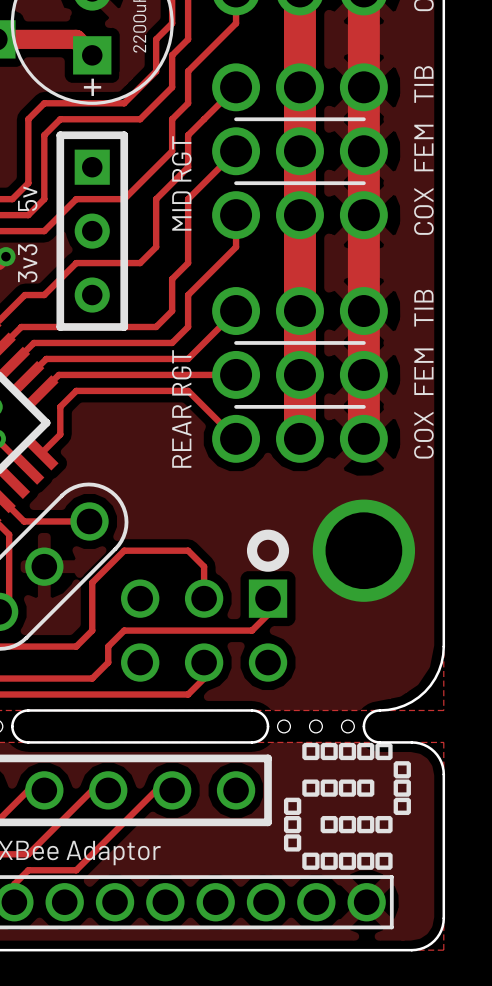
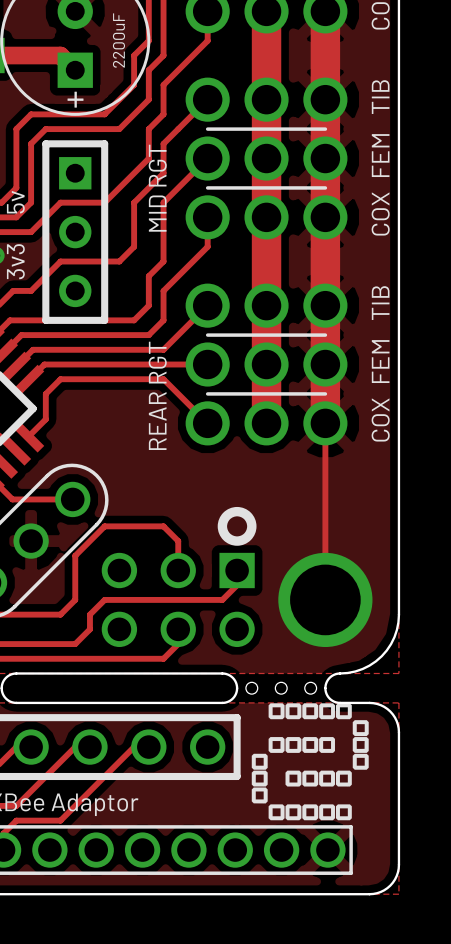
track: none -> (325, 423) (325, 599)
part position: (363, 550) -> (325, 599)

